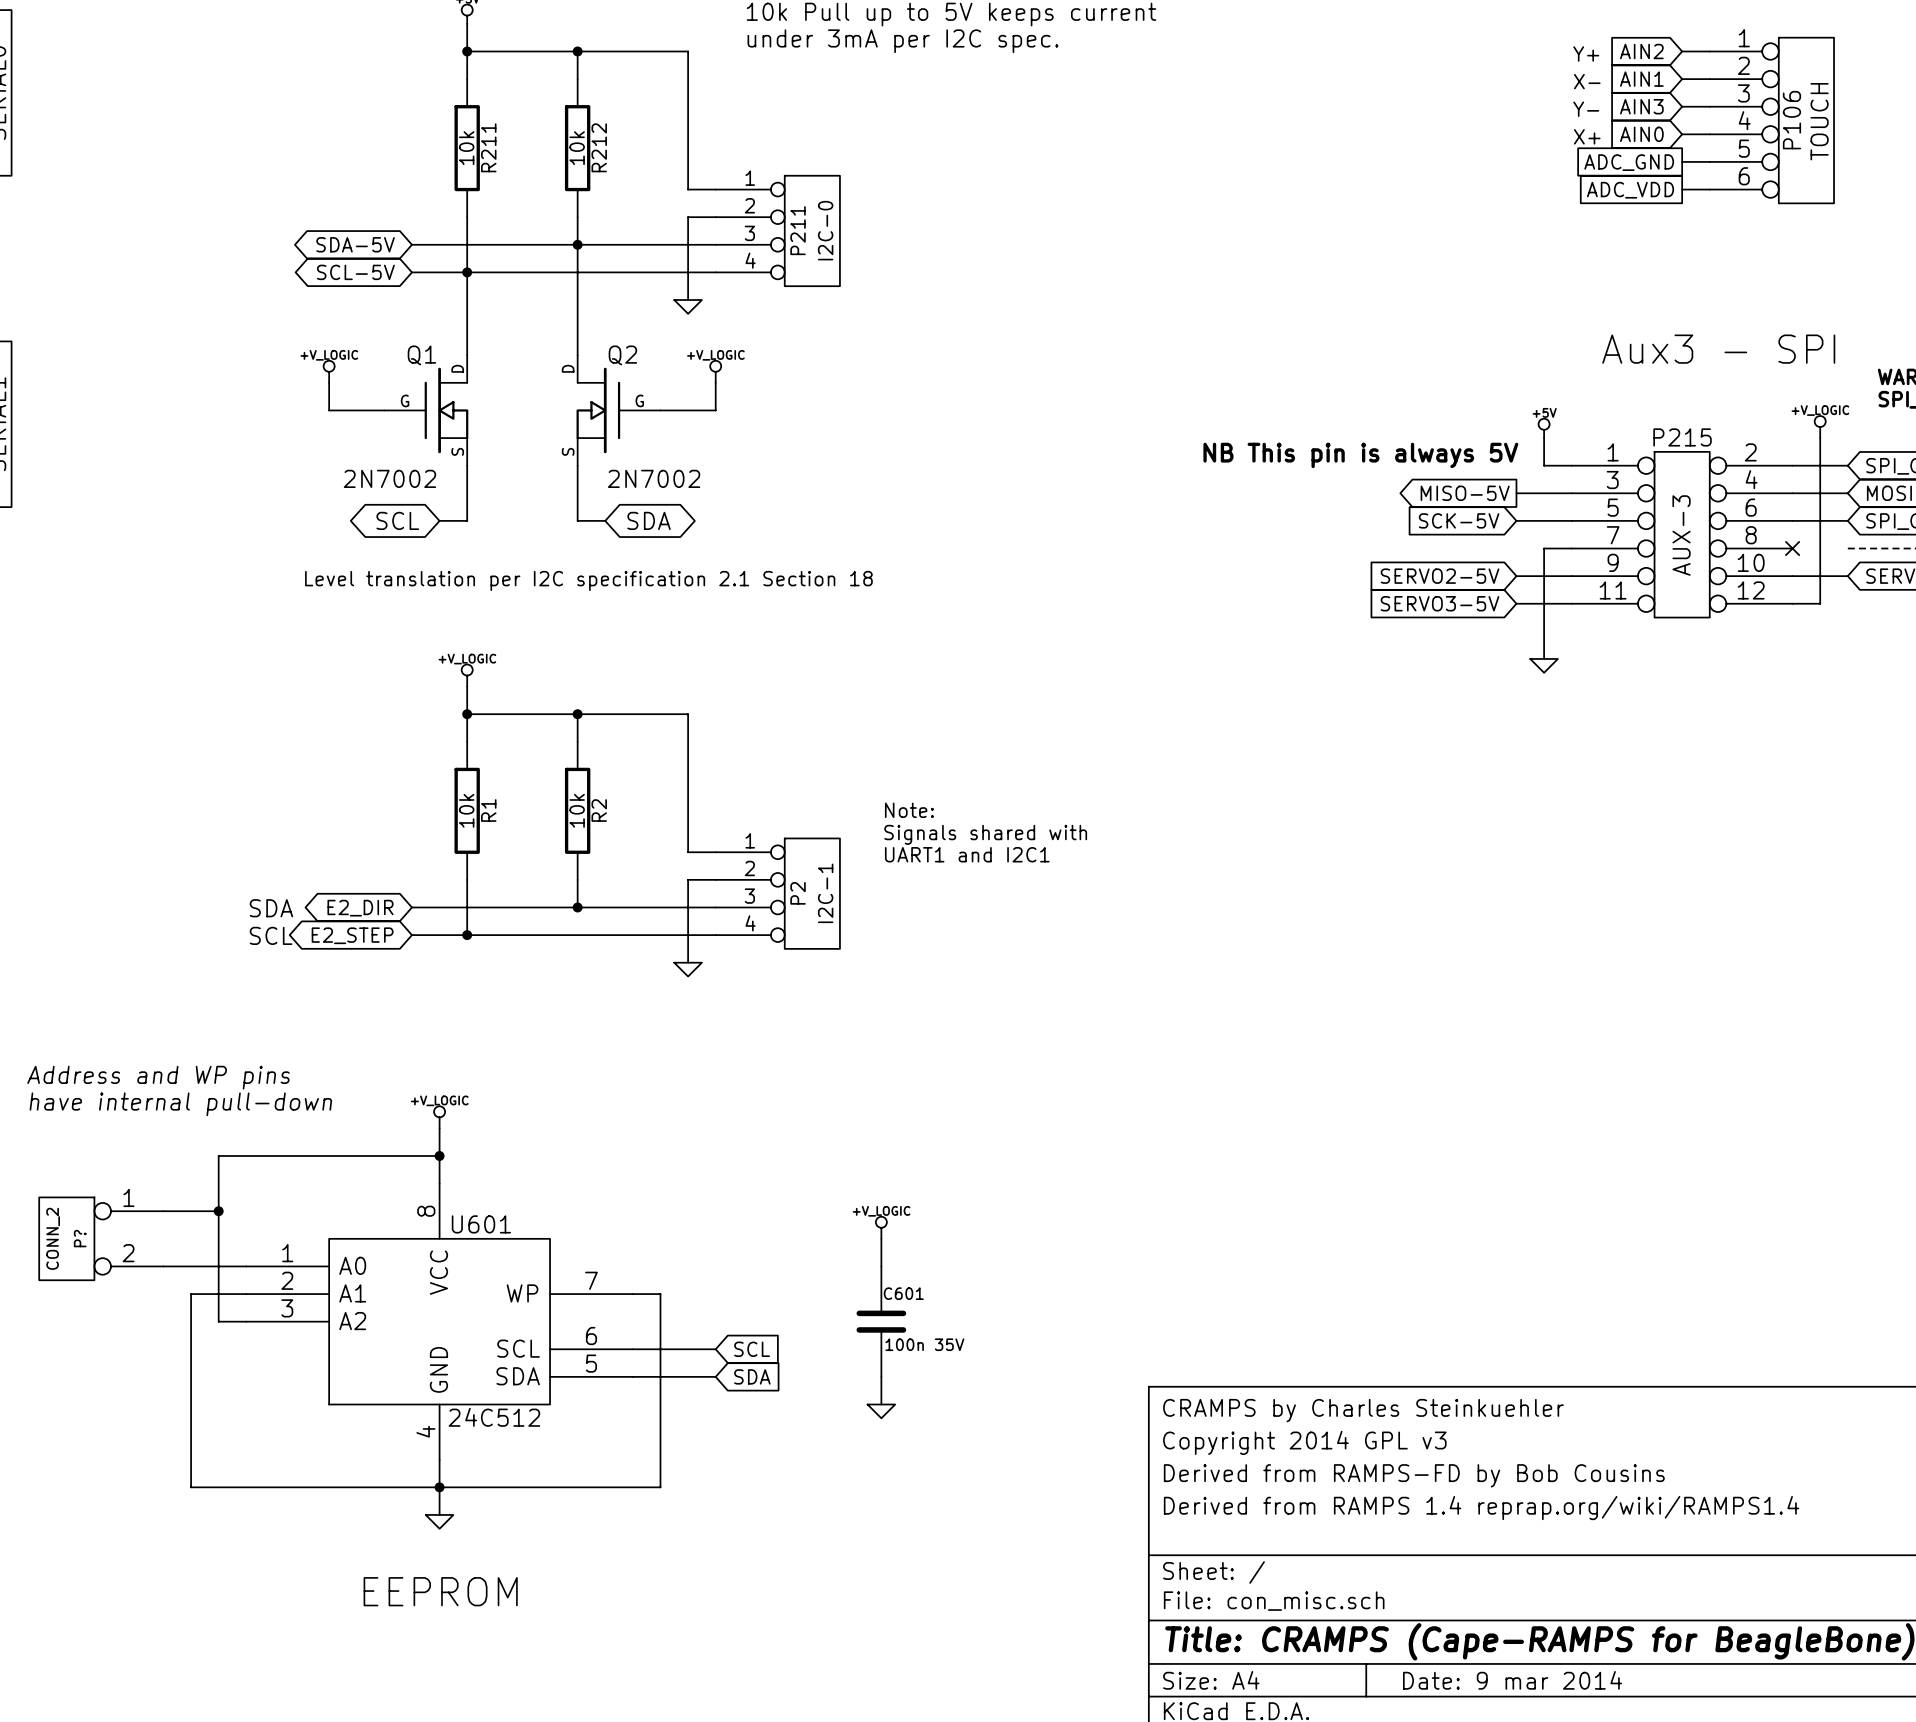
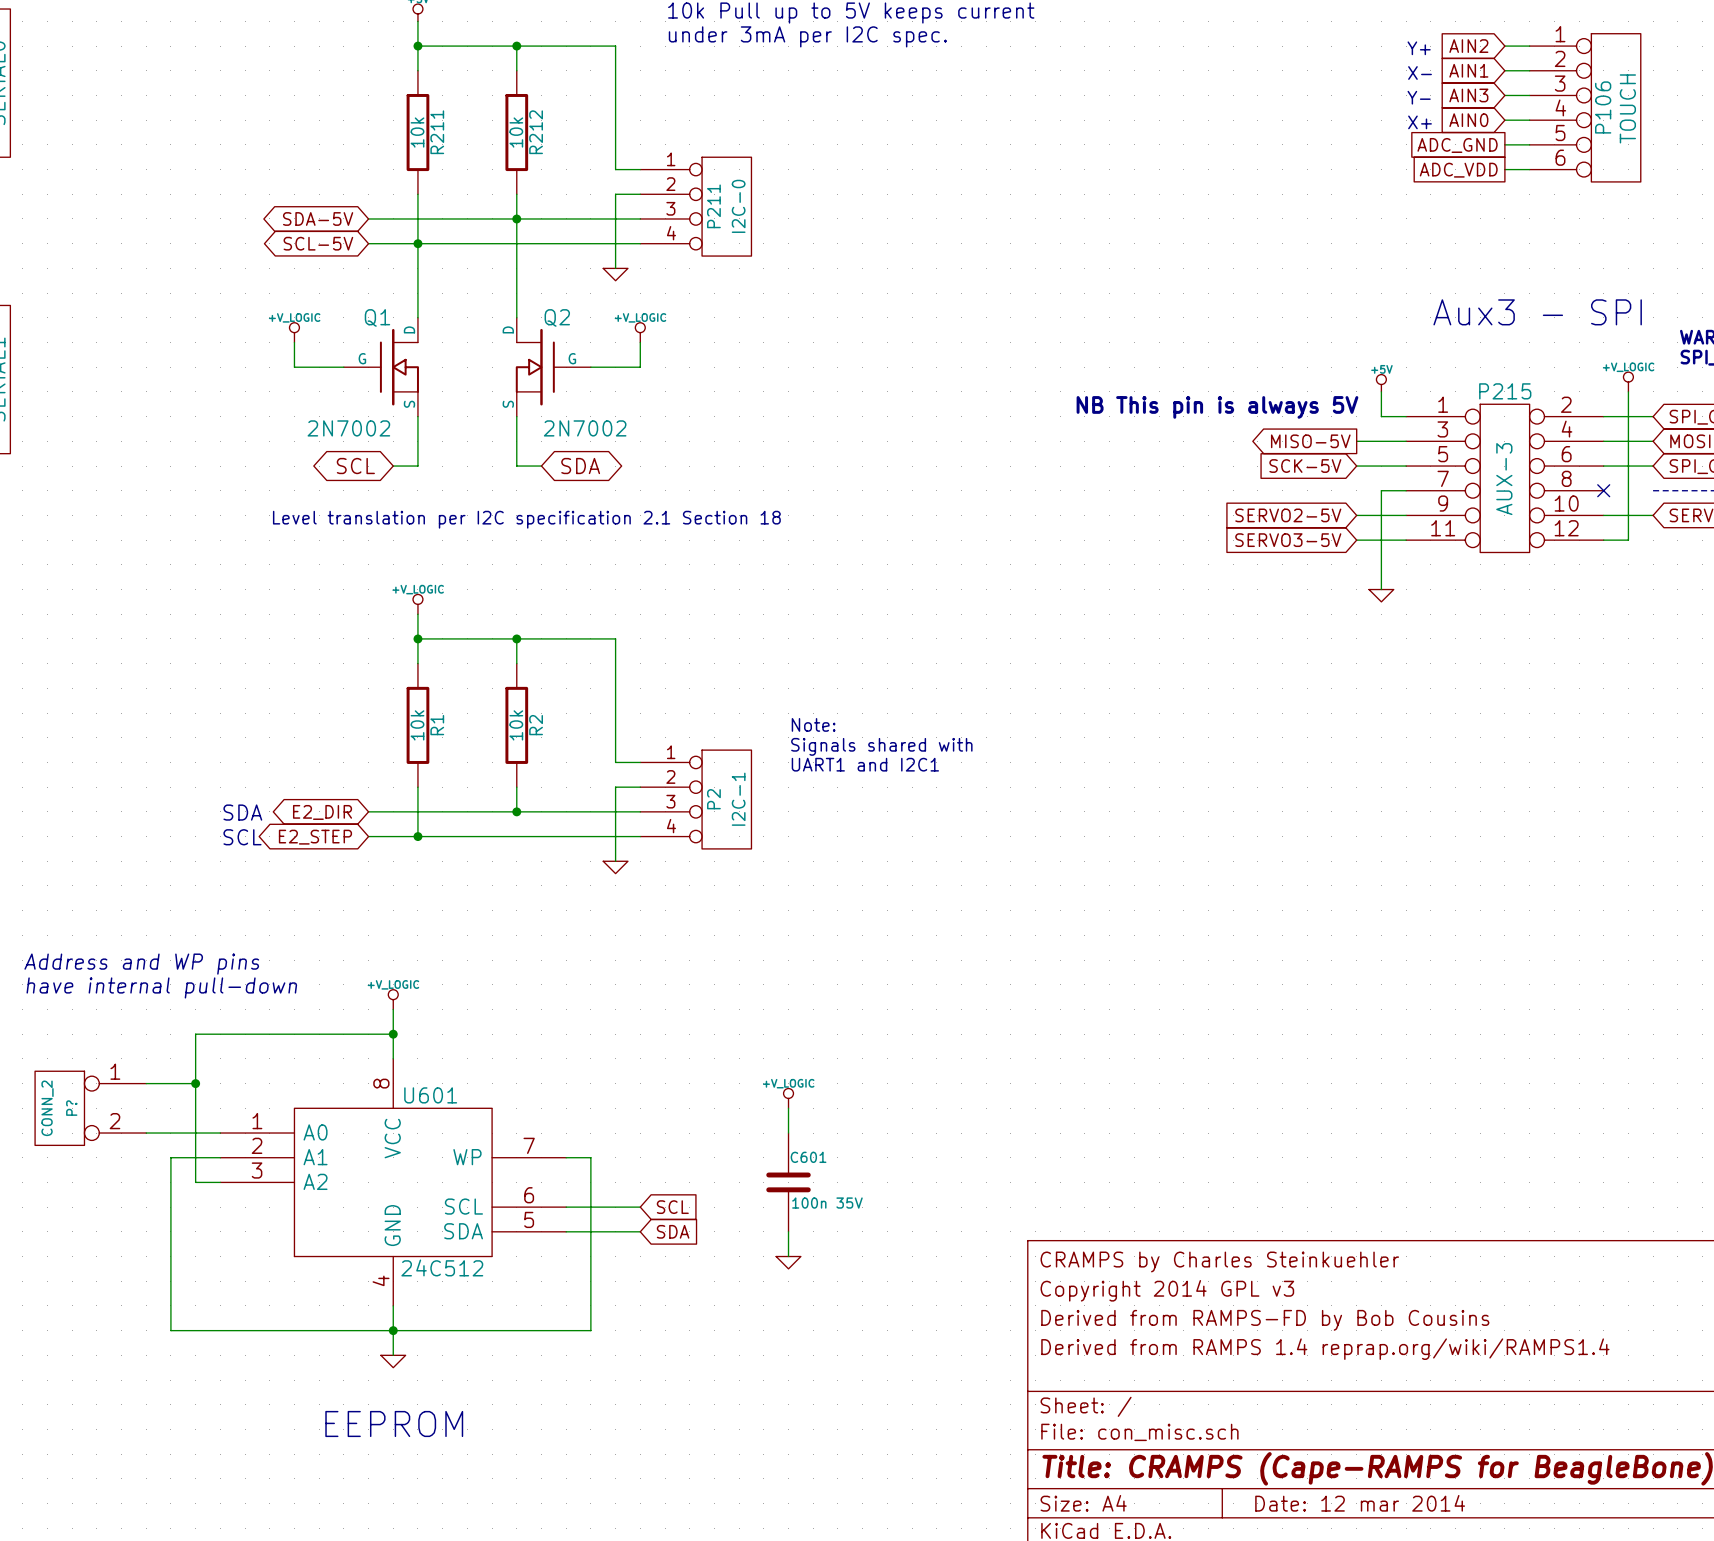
title block: Date: 9 mar 2014 (1512, 1680) -> Date: 12 mar 2014 (1360, 1503)

